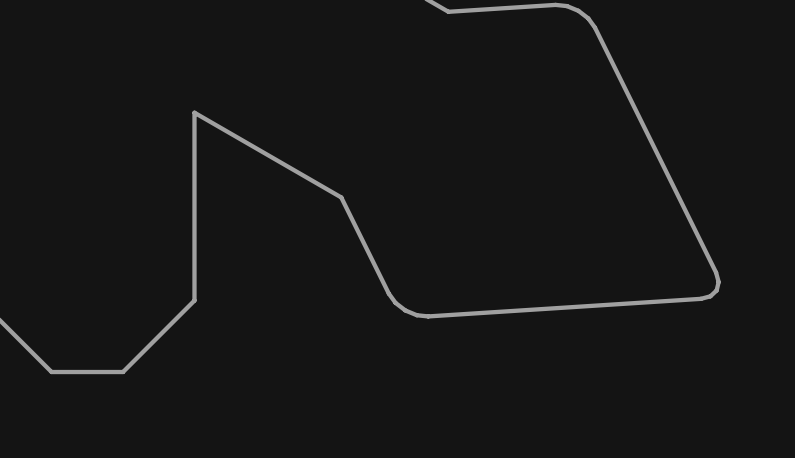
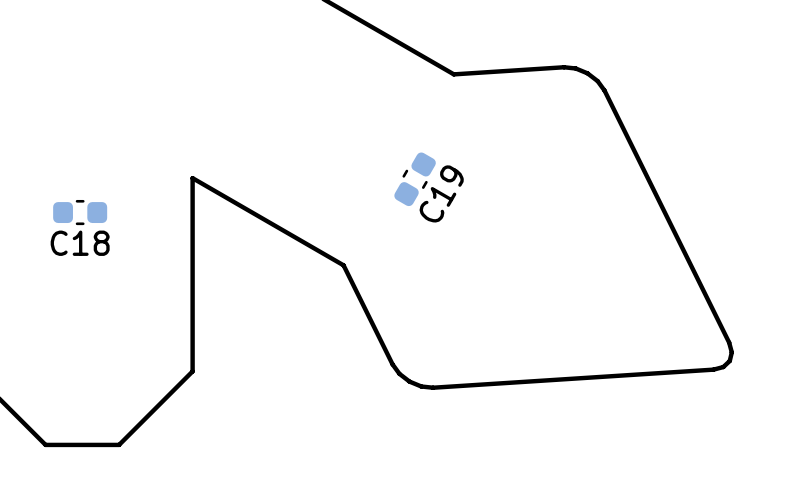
C19: none -> (415, 179)
C18: none -> (80, 212)

